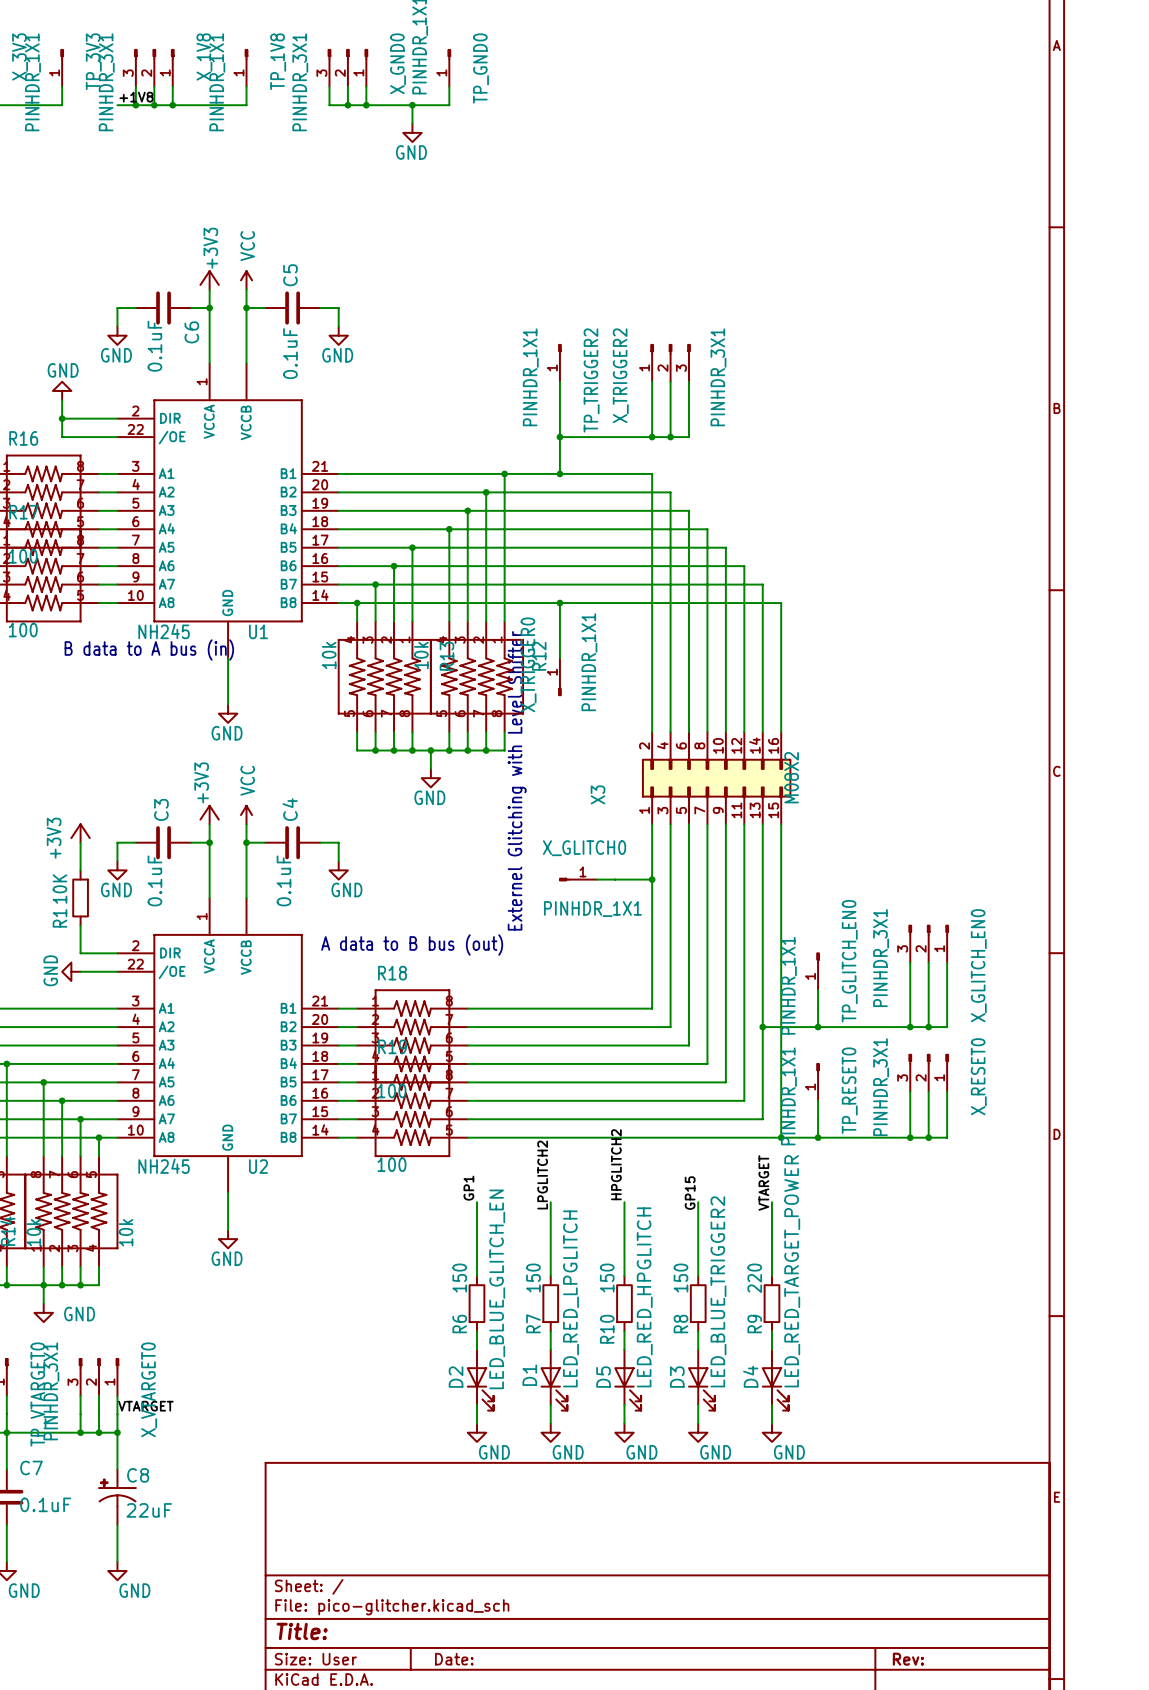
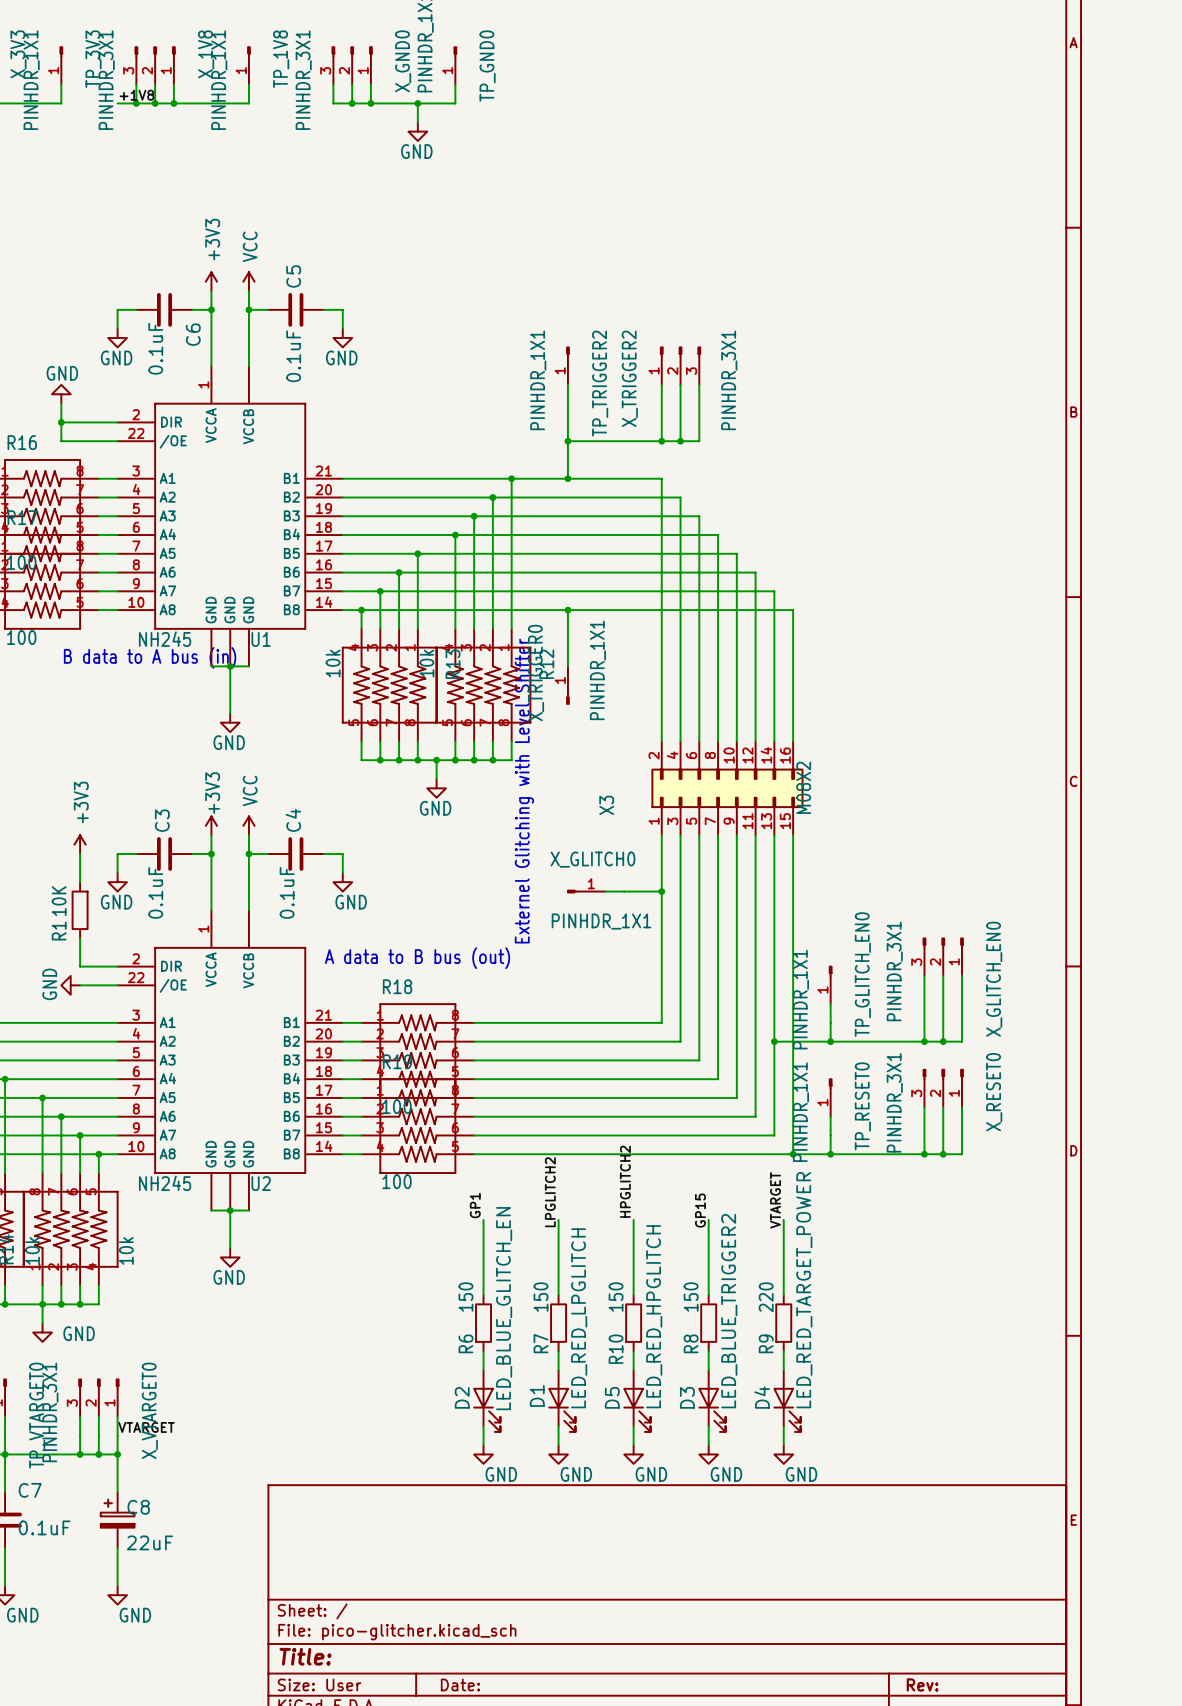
power symbol shape: [199, 270, 220, 290] -> [205, 272, 218, 292]
U1 symbol: [117, 363, 339, 659] -> [117, 366, 343, 667]
wire: none -> (211, 666) (248, 666)
junction: none -> (230, 666)
power symbol shape: [199, 804, 220, 825] -> [205, 816, 218, 836]
power symbol shape: [70, 823, 91, 843] -> [74, 835, 86, 855]
power symbol text position: +3V3 (54, 838) -> +3V3 (81, 802)
U2 symbol: [117, 898, 339, 1194] -> [117, 910, 343, 1211]
wire: none -> (211, 1210) (248, 1210)
junction: none -> (230, 1210)
C8 symbol: [98, 1469, 137, 1525] -> [100, 1491, 135, 1549]

